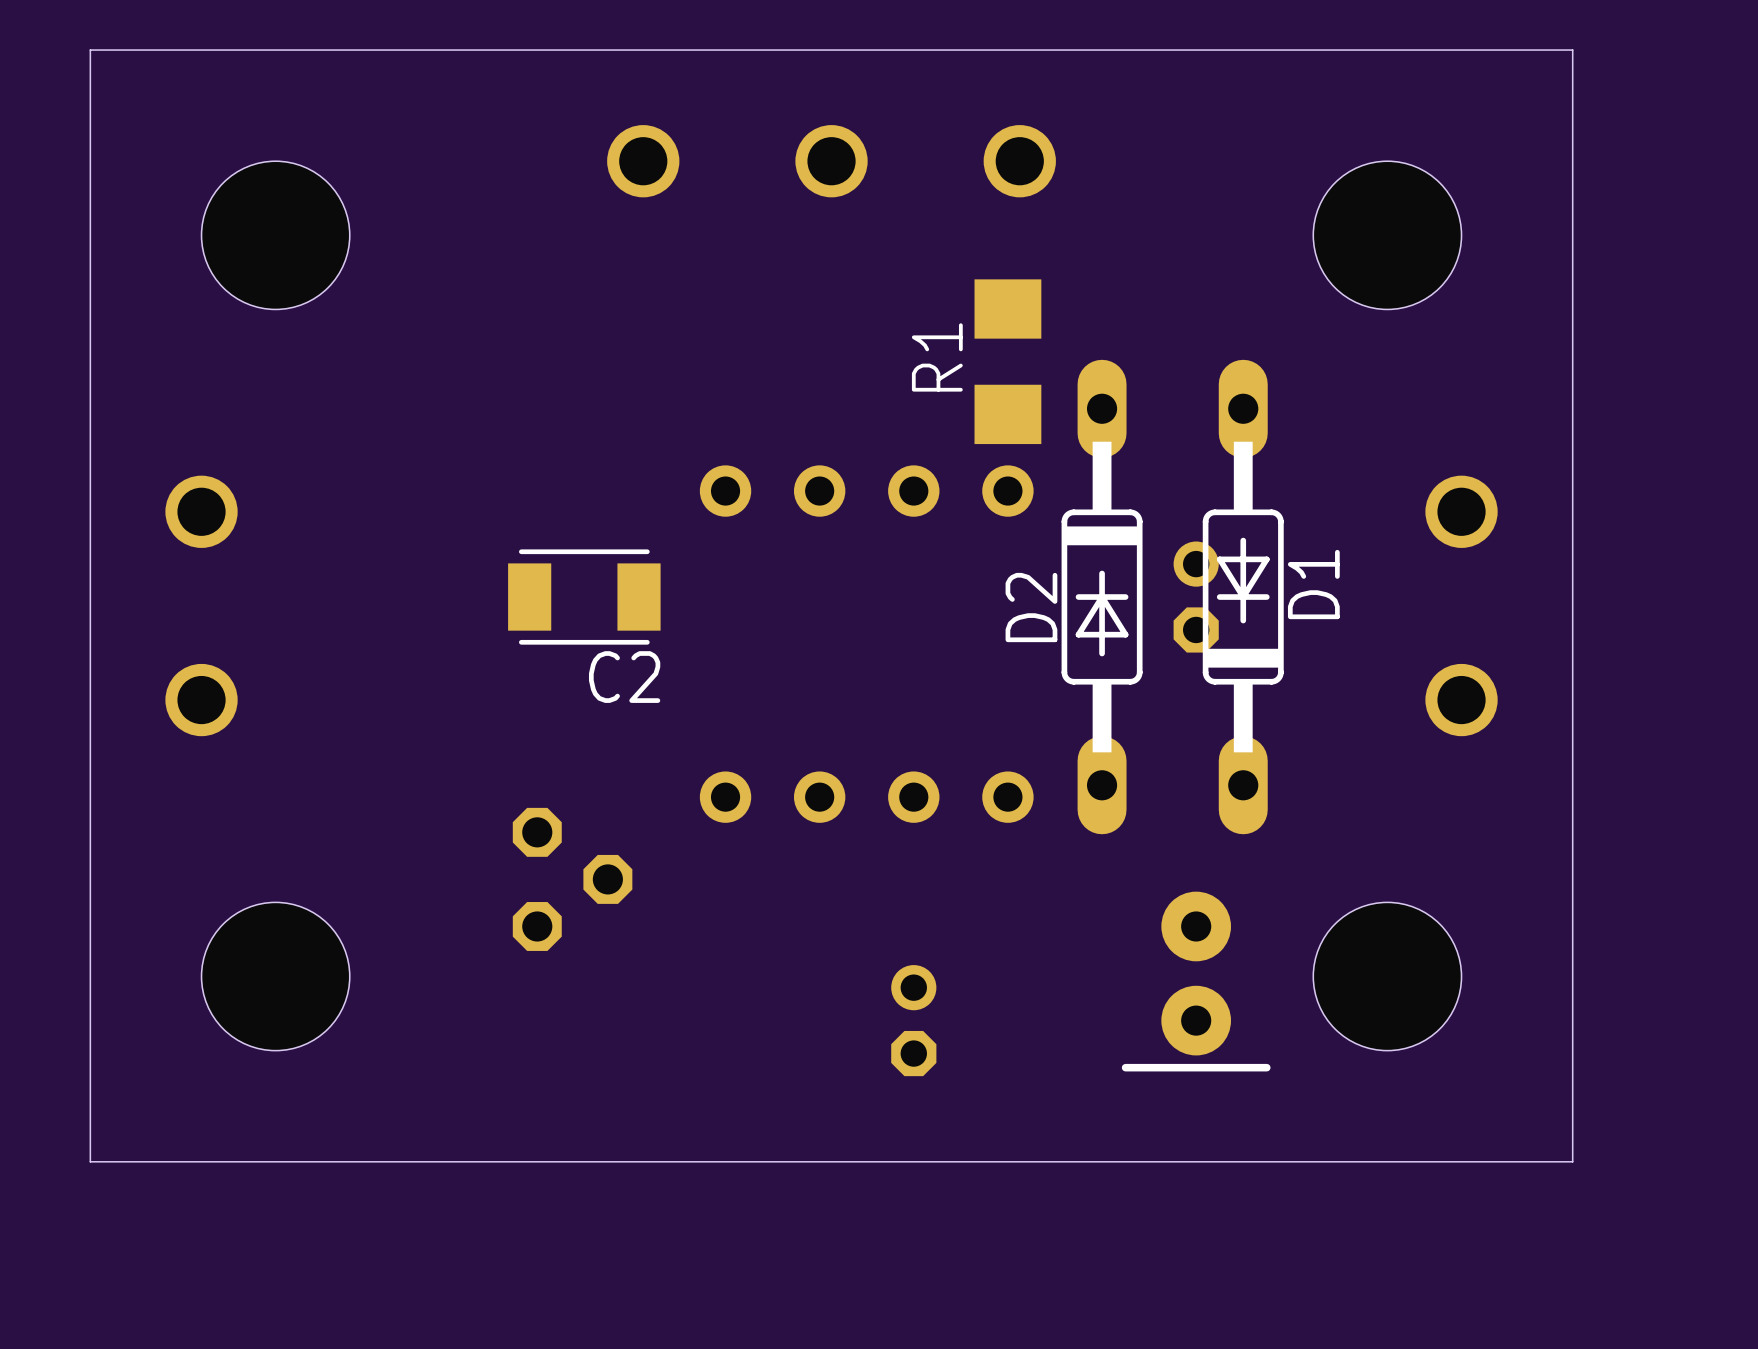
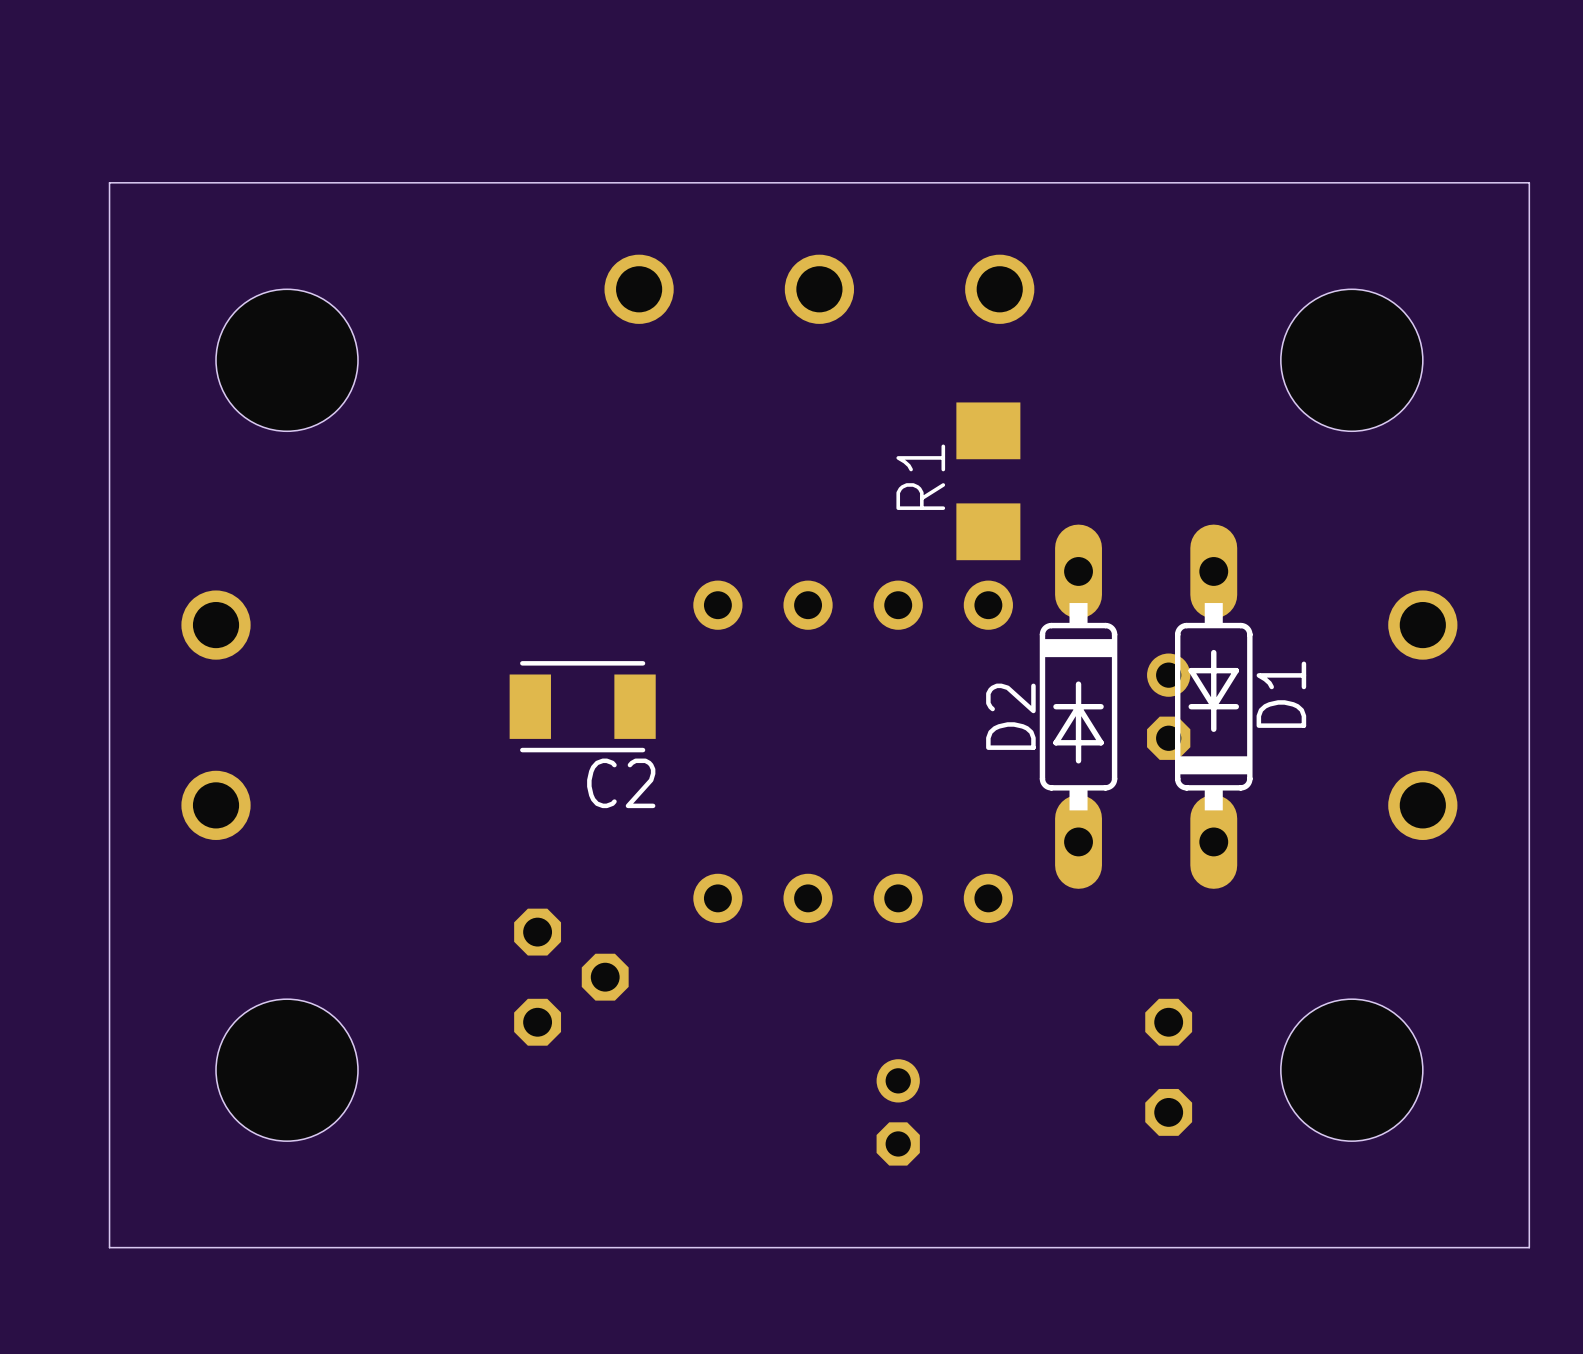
D2 footprint: [1061, 359, 1143, 835] -> [1039, 524, 1118, 889]
D1 footprint: [1202, 359, 1284, 835] -> [1175, 524, 1253, 889]
part footprint: [1121, 891, 1271, 1072] -> [1145, 998, 1193, 1136]

